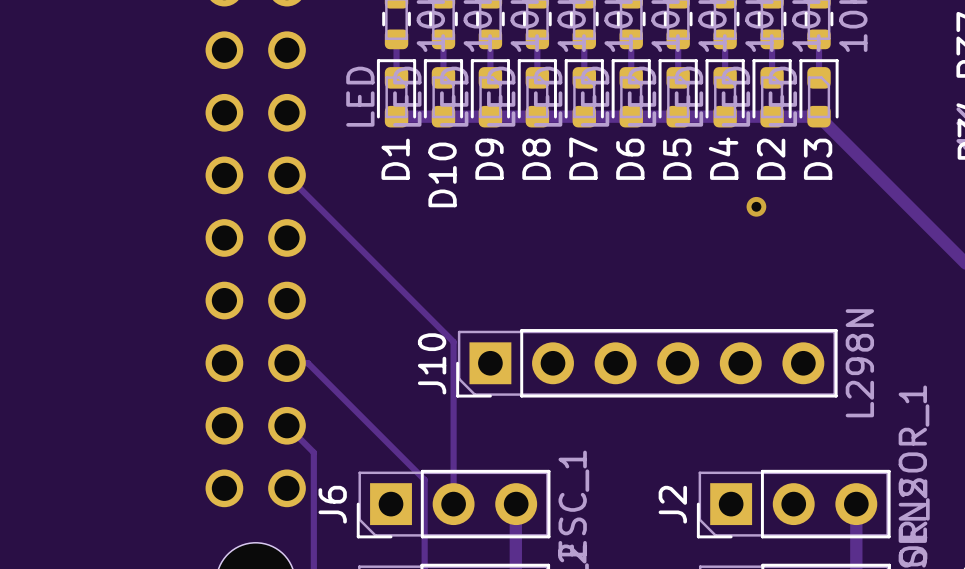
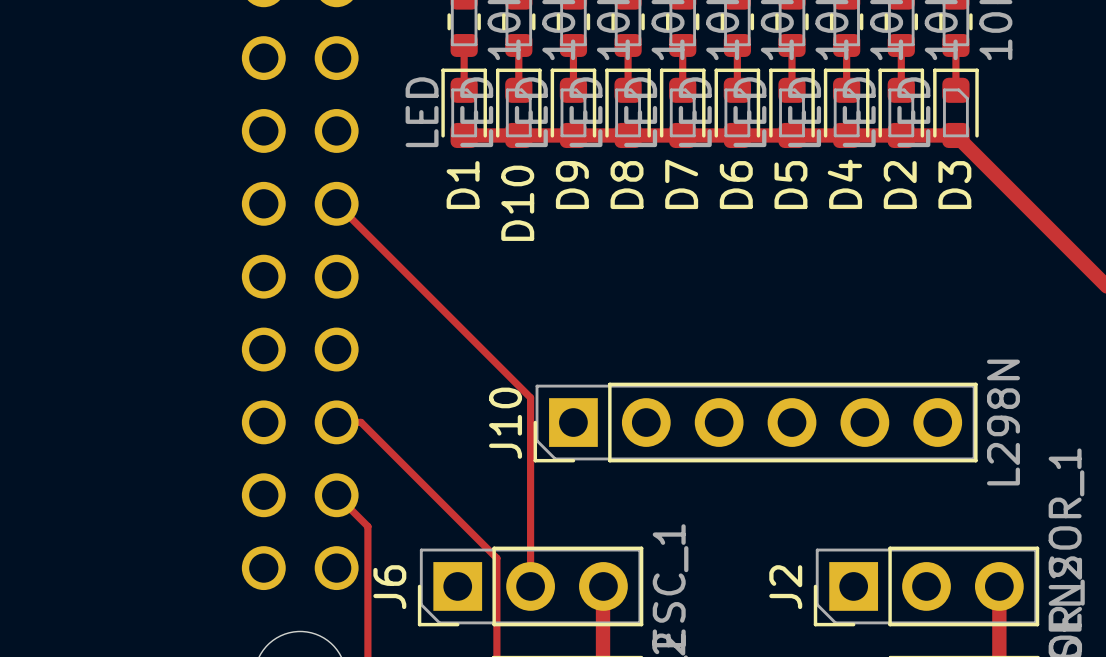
via: (756, 206) -> none

